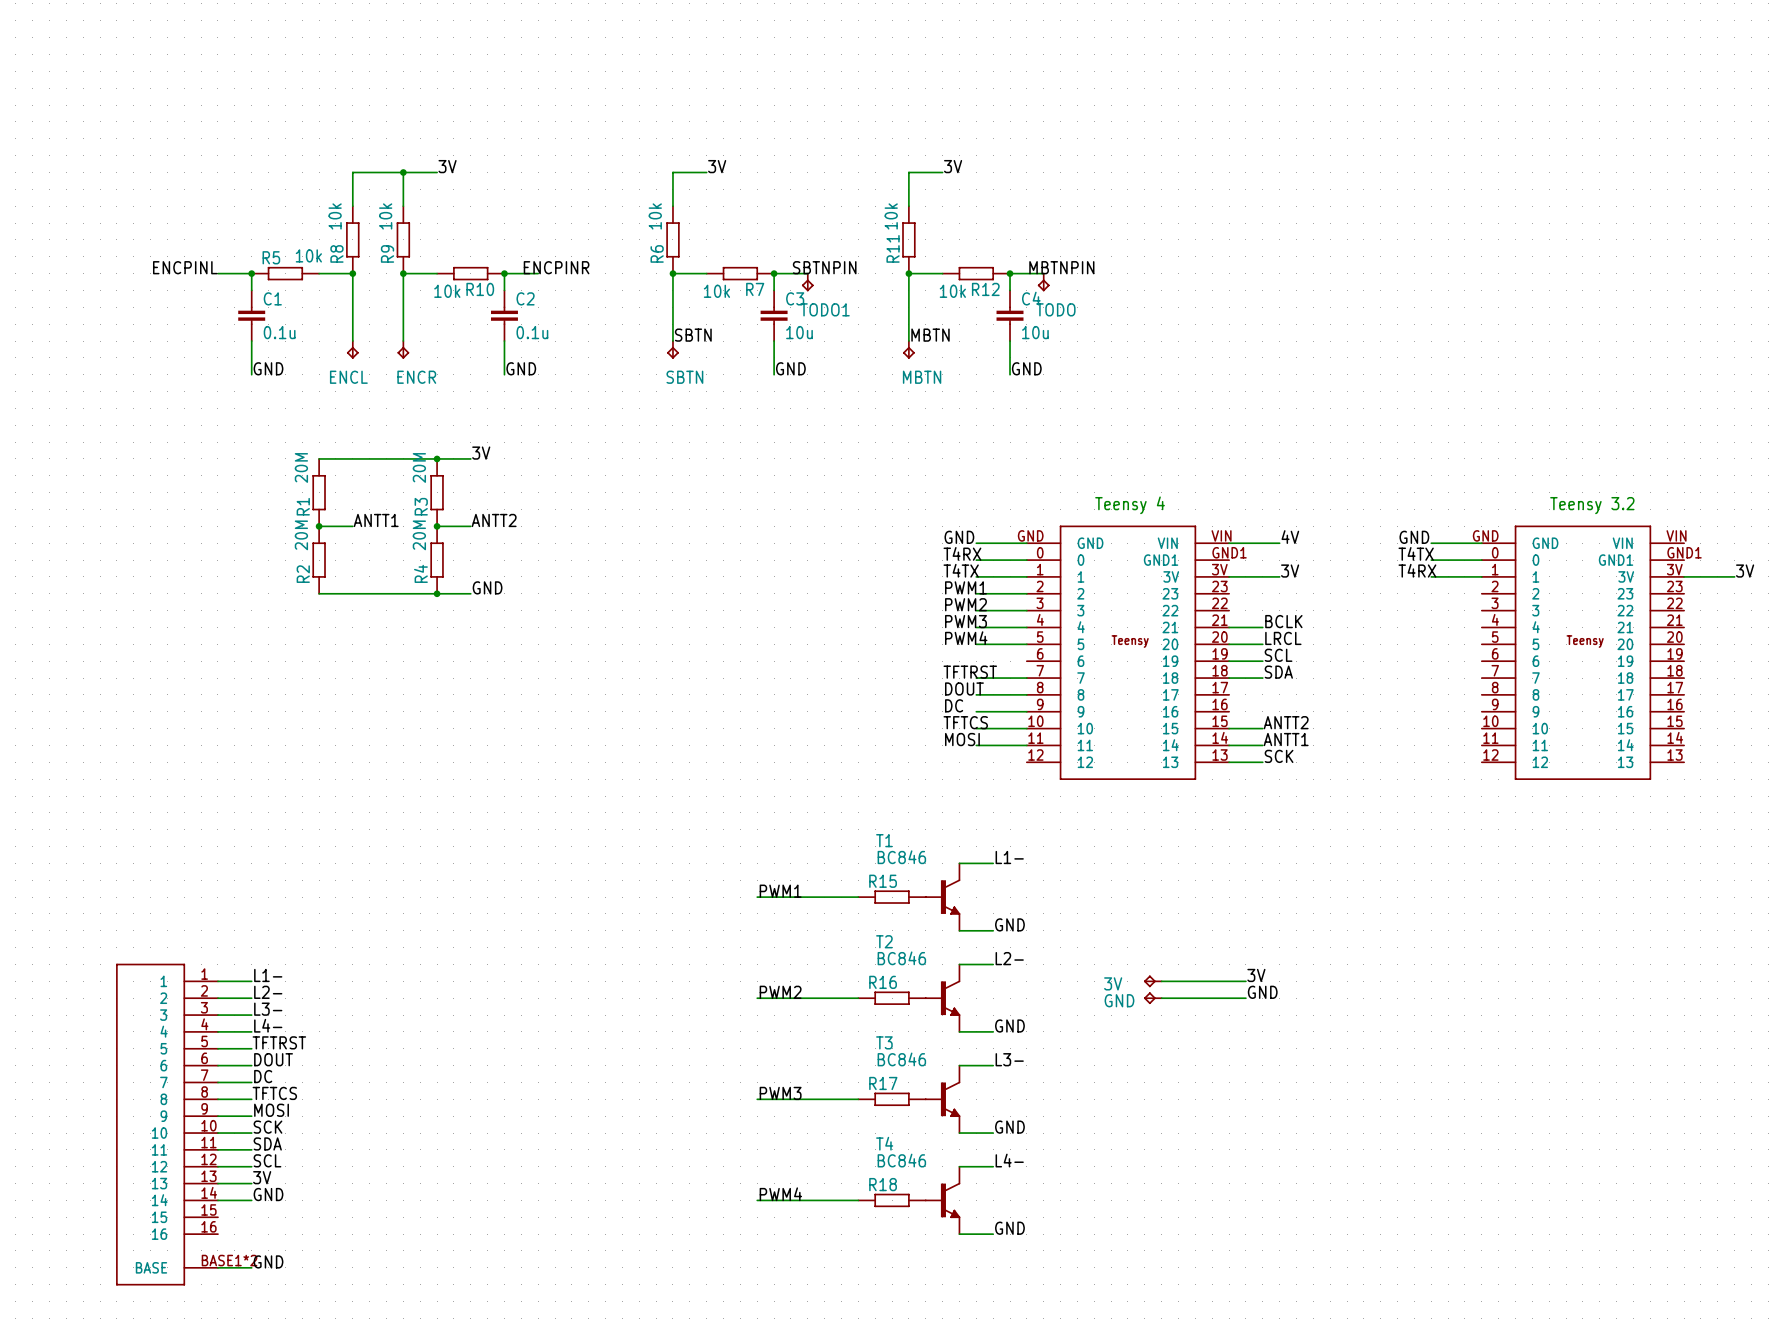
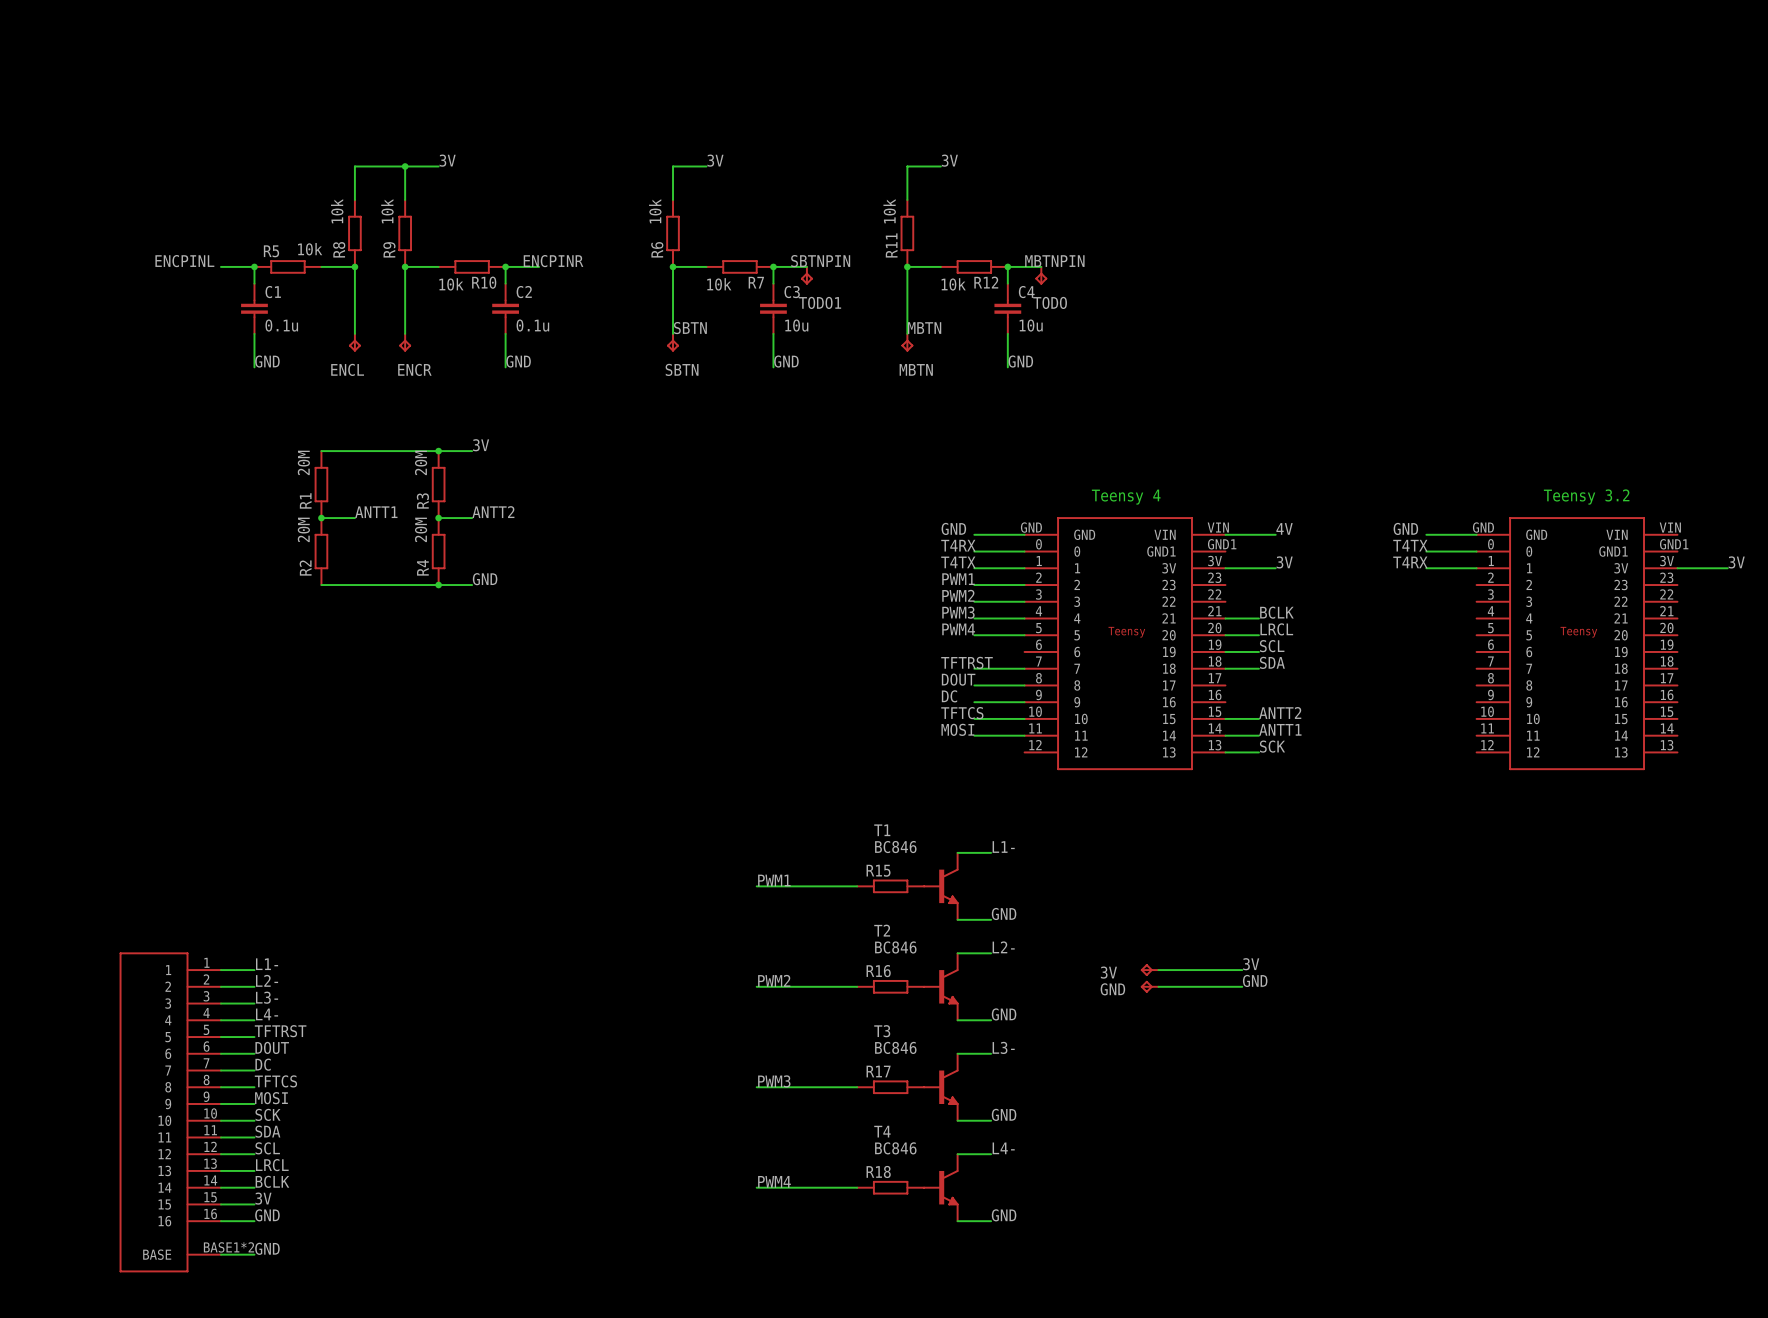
label: 3V (262, 1177) -> LRCL (272, 1165)
label: GND (268, 1194) -> BCLK (272, 1181)
label: none -> 3V (263, 1198)
wire: none -> (220, 1204) (254, 1204)
label: none -> GND (267, 1215)
wire: none -> (220, 1221) (254, 1221)

